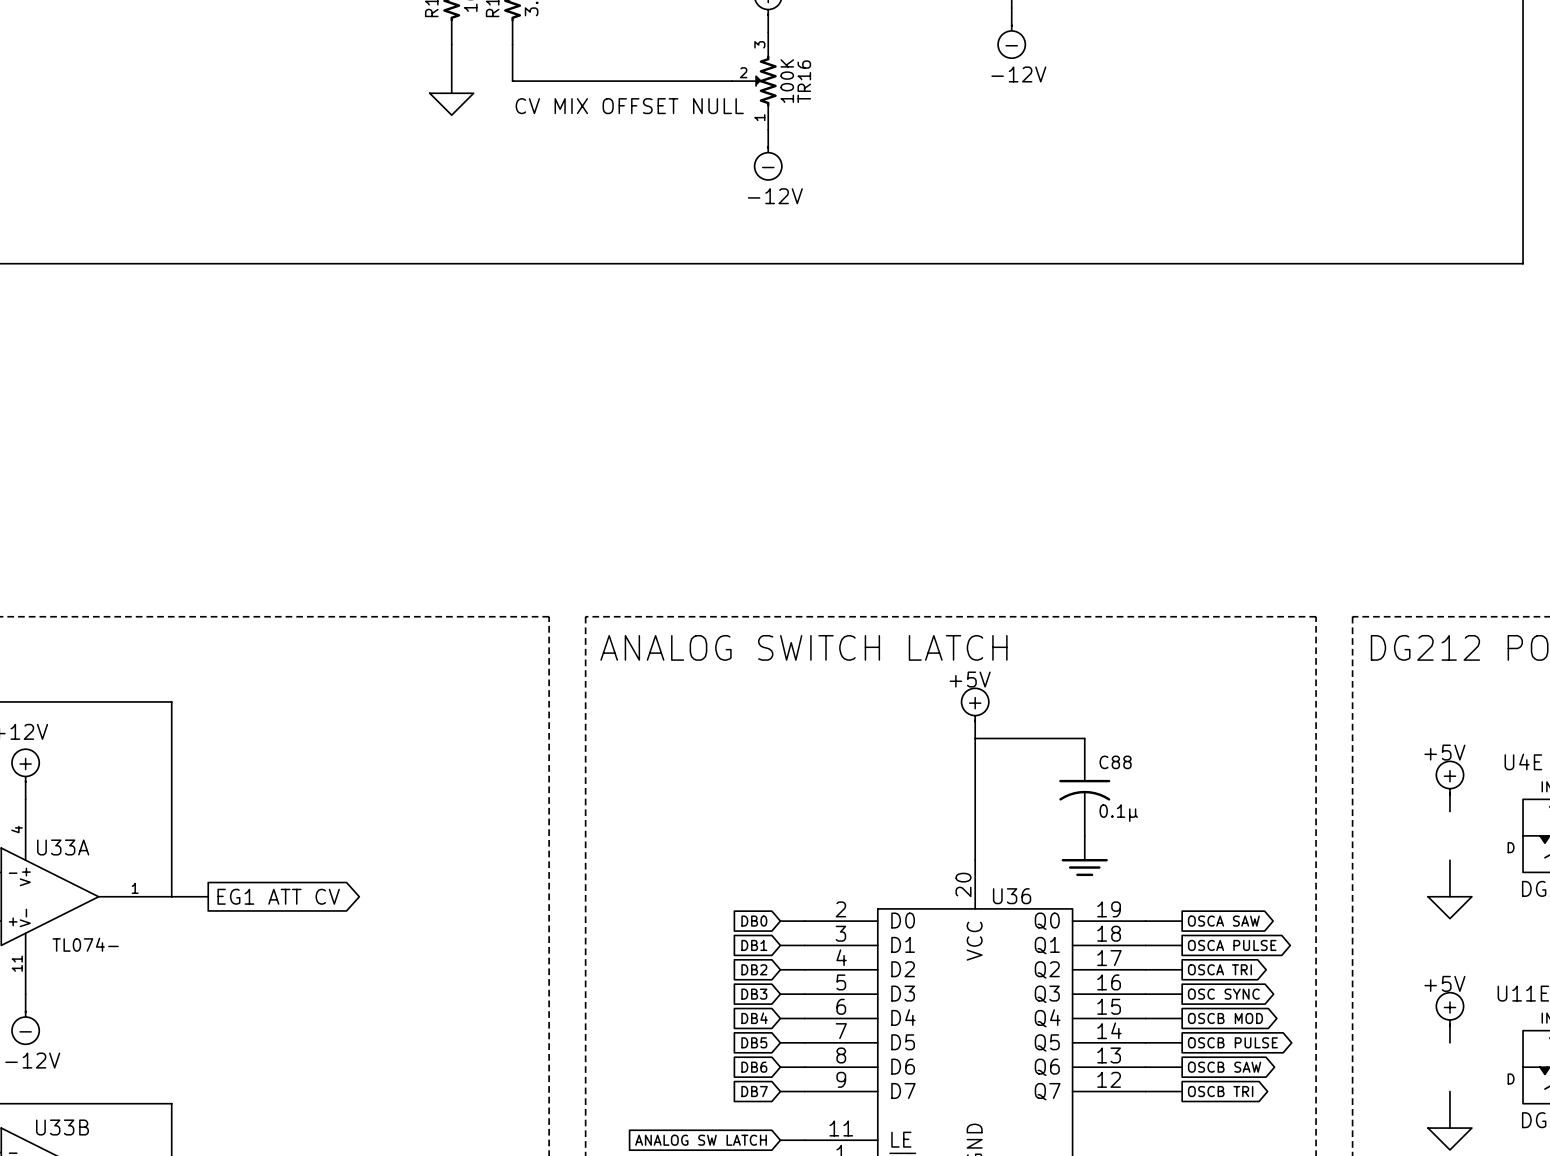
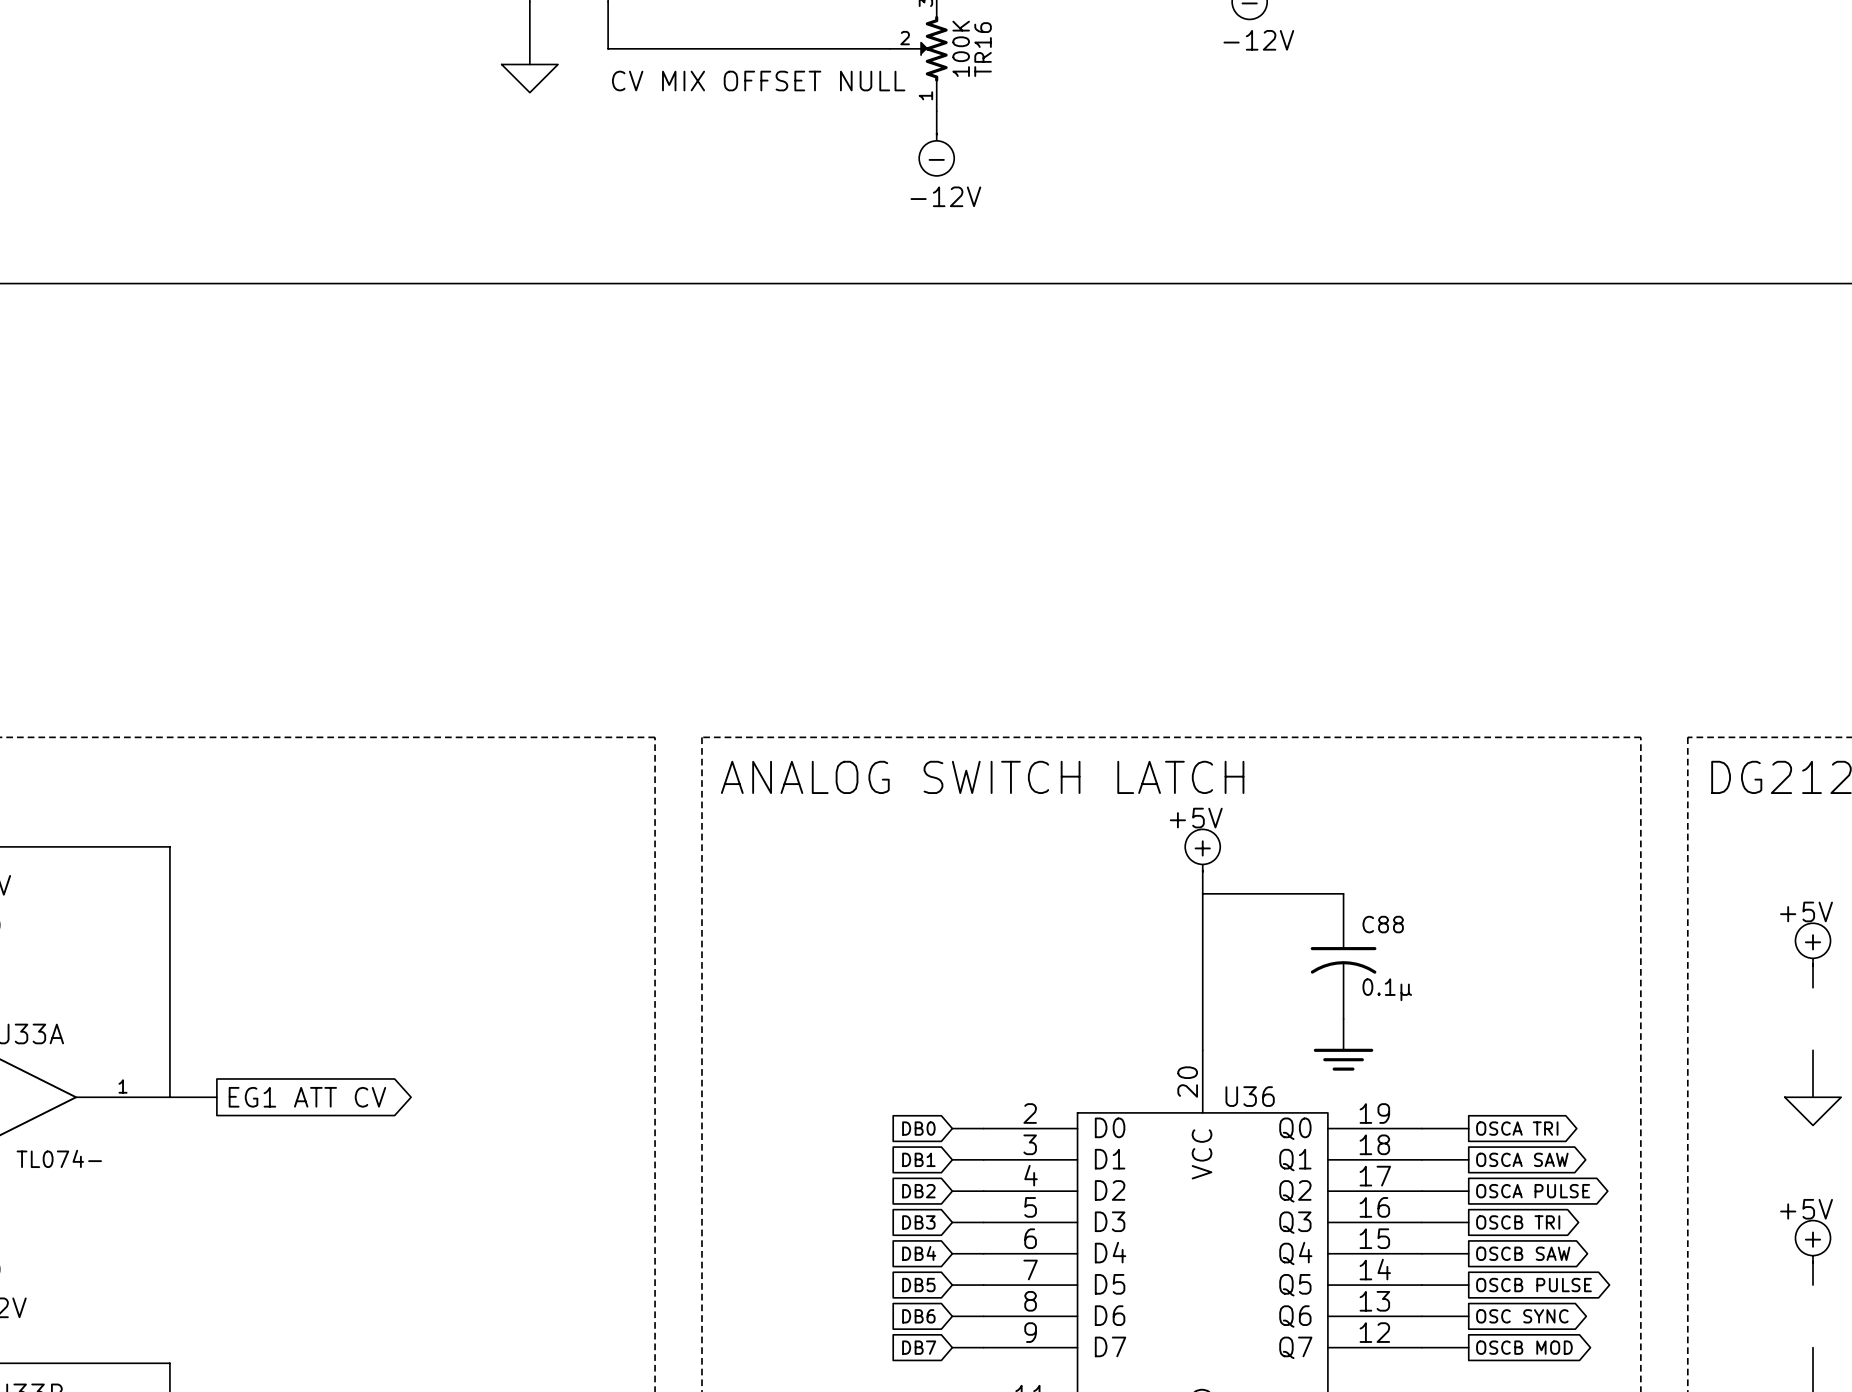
global label: OSCA SAW (1223, 921) -> OSCA TRI (1517, 1128)
global label: OSCA PULSE (1232, 945) -> OSCA SAW (1522, 1159)
global label: OSCA TRI (1219, 969) -> OSCA PULSE (1533, 1191)
global label: OSC SYNC (1223, 994) -> OSCB TRI (1518, 1222)
global label: OSCB MOD (1225, 1018) -> OSCB SAW (1523, 1253)
global label: OSCB SAW (1224, 1067) -> OSC SYNC (1522, 1316)
global label: OSCB TRI (1220, 1091) -> OSCB MOD (1524, 1347)

